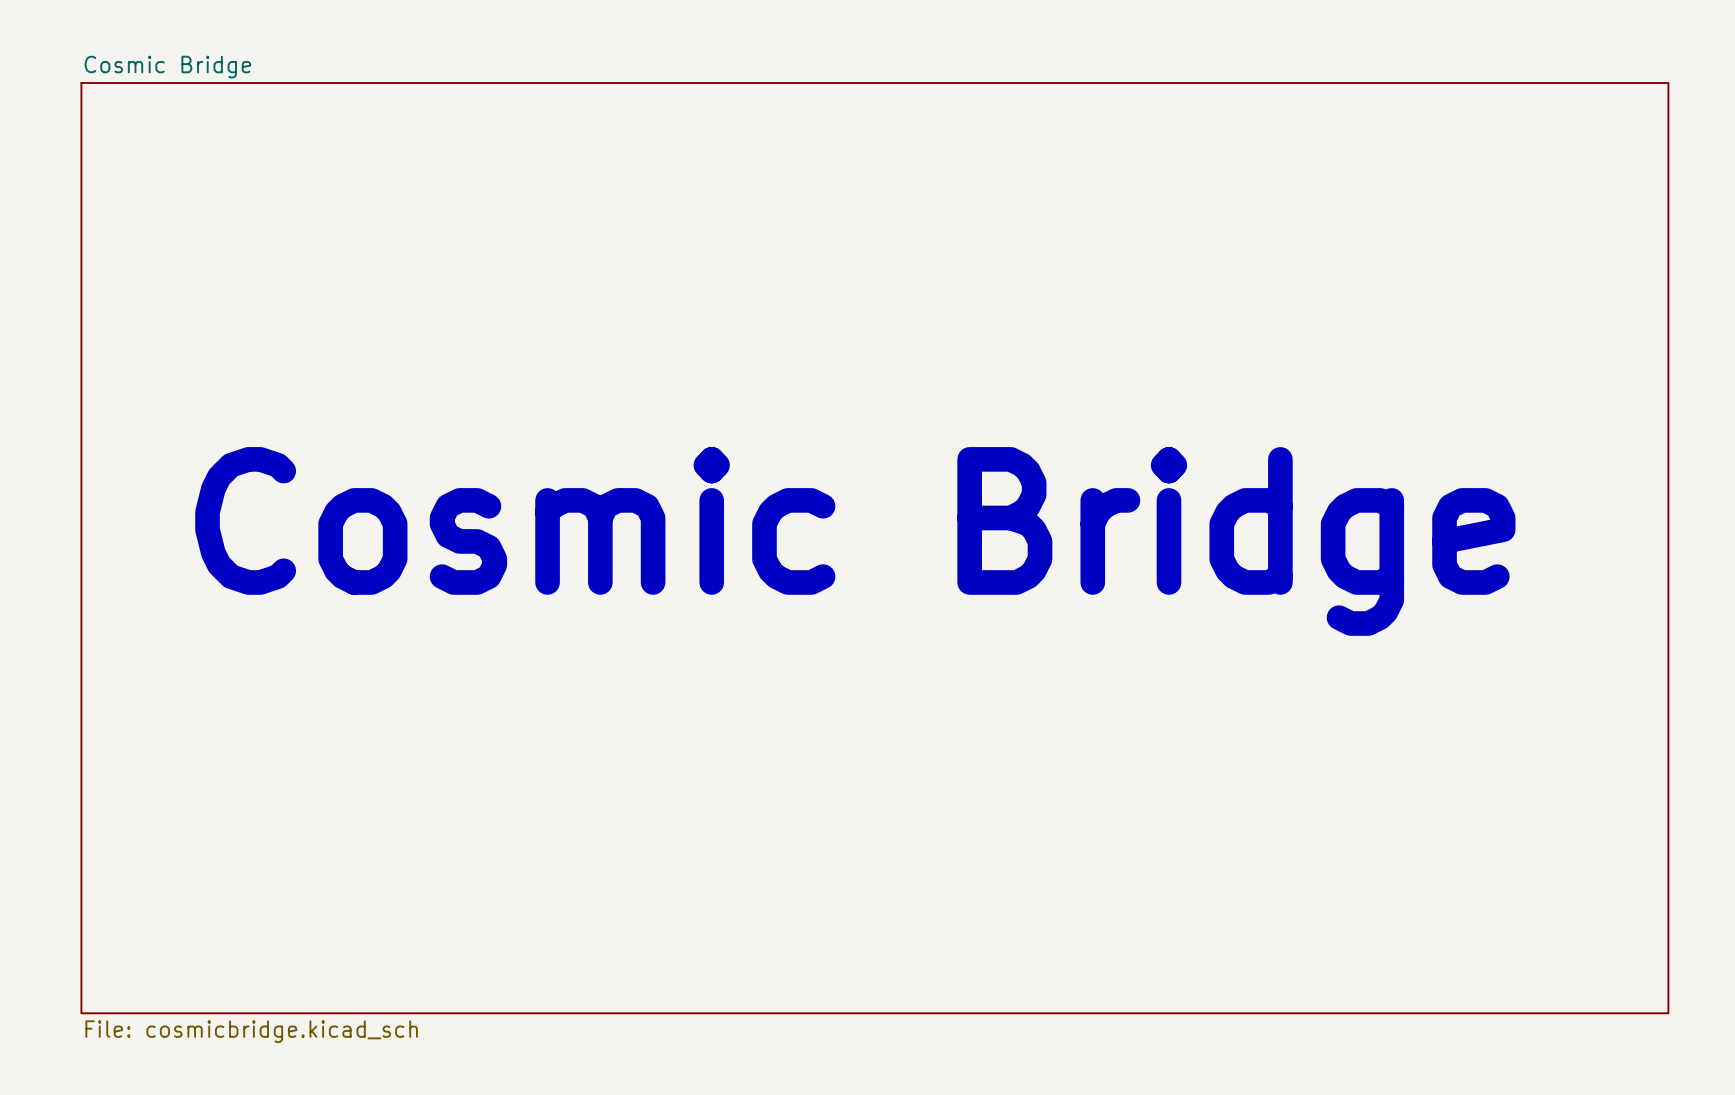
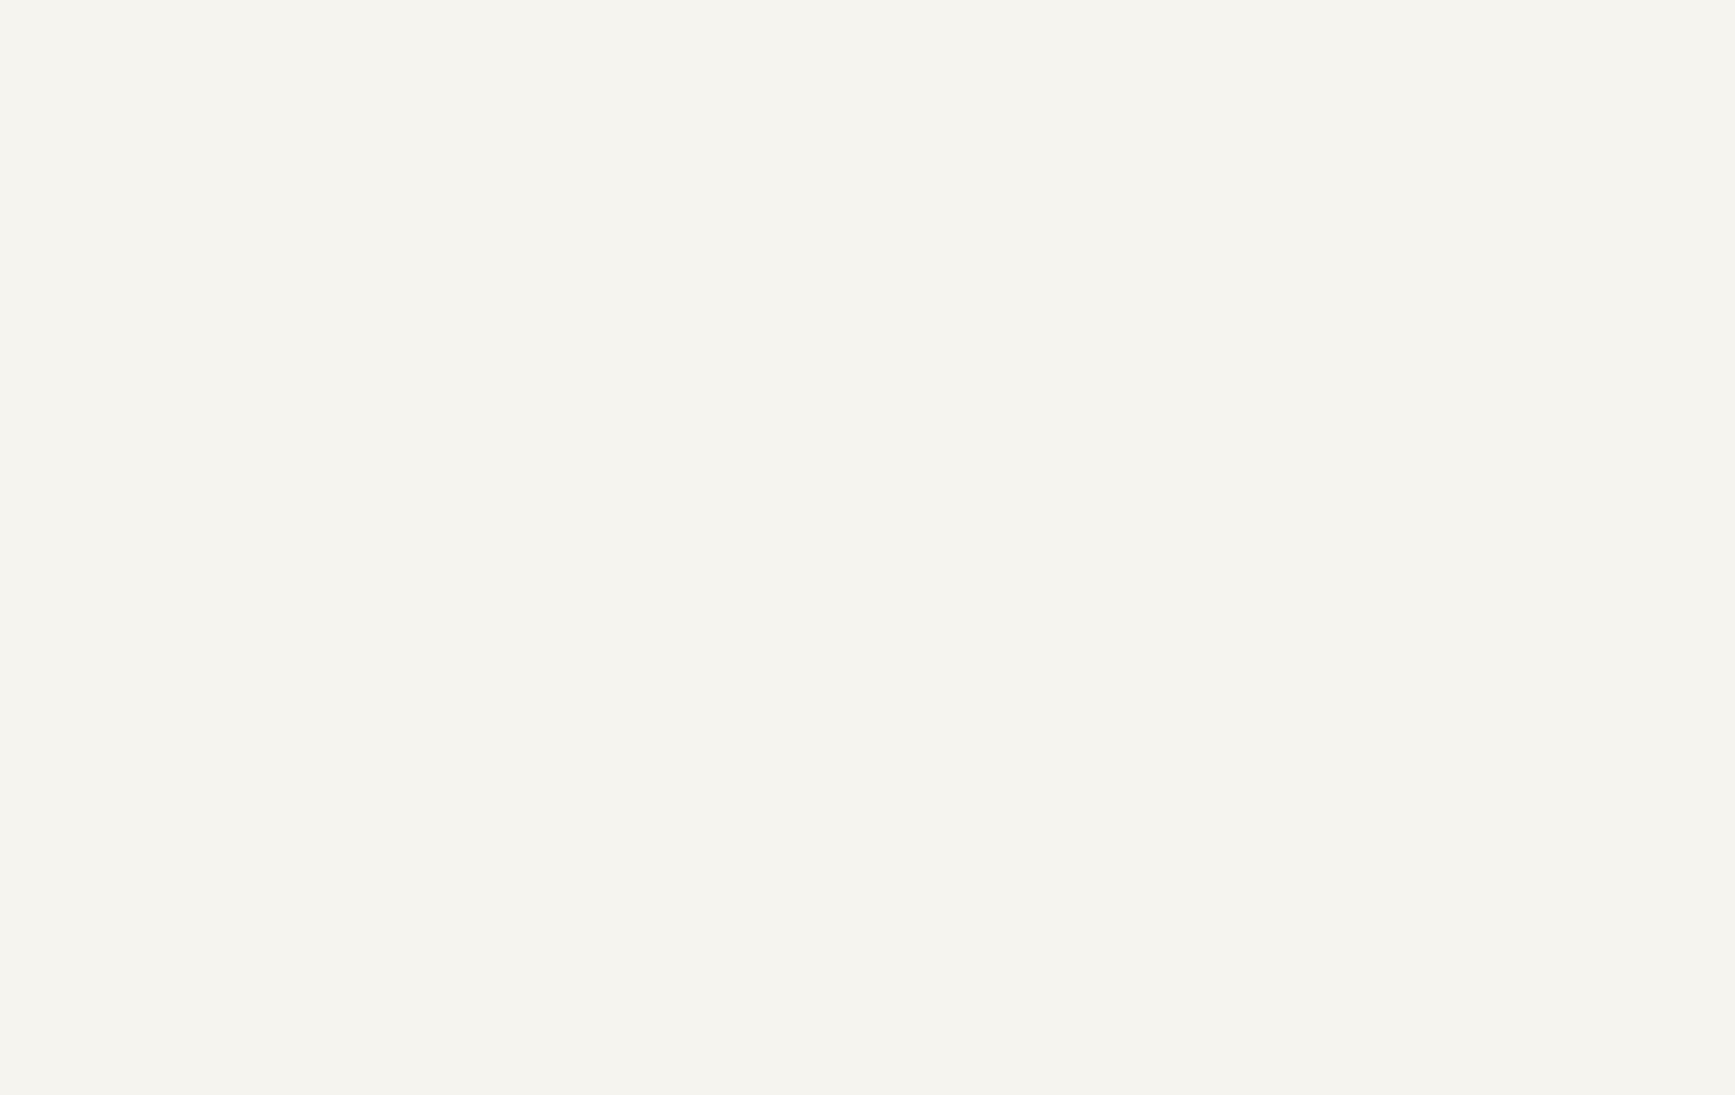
text: Cosmic Bridge (855, 541) -> none
sheet Cosmic Bridge: File: cosmicbridge.kicad_sch (874, 548) -> none

